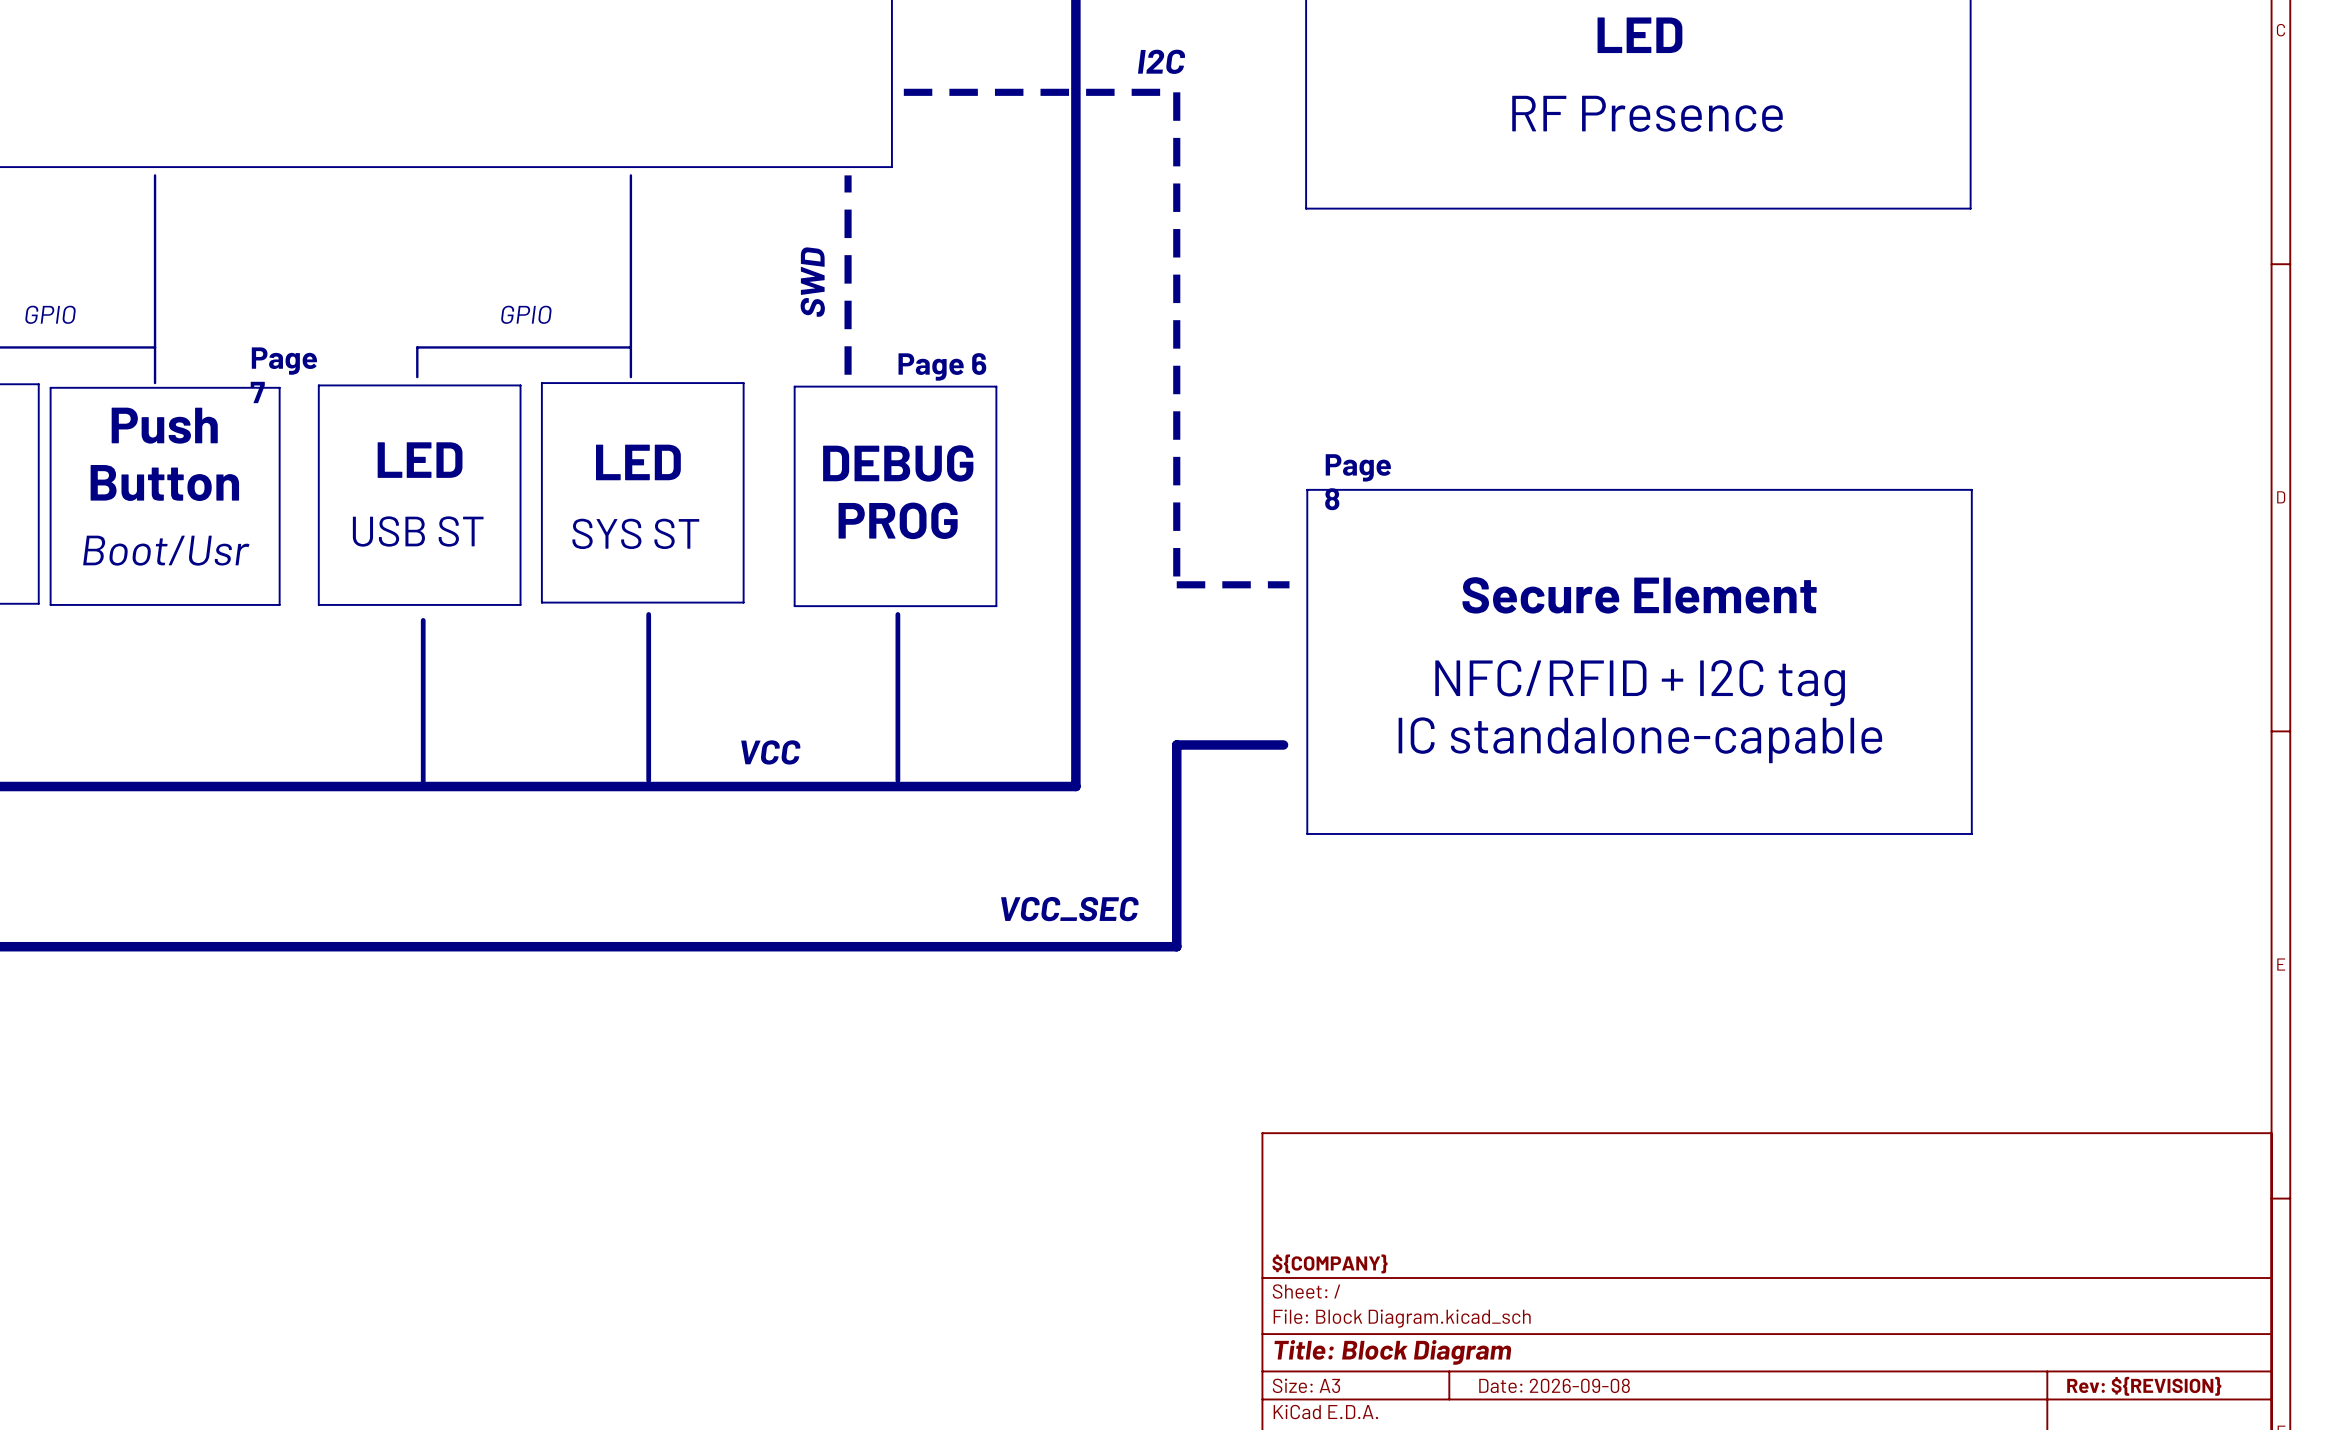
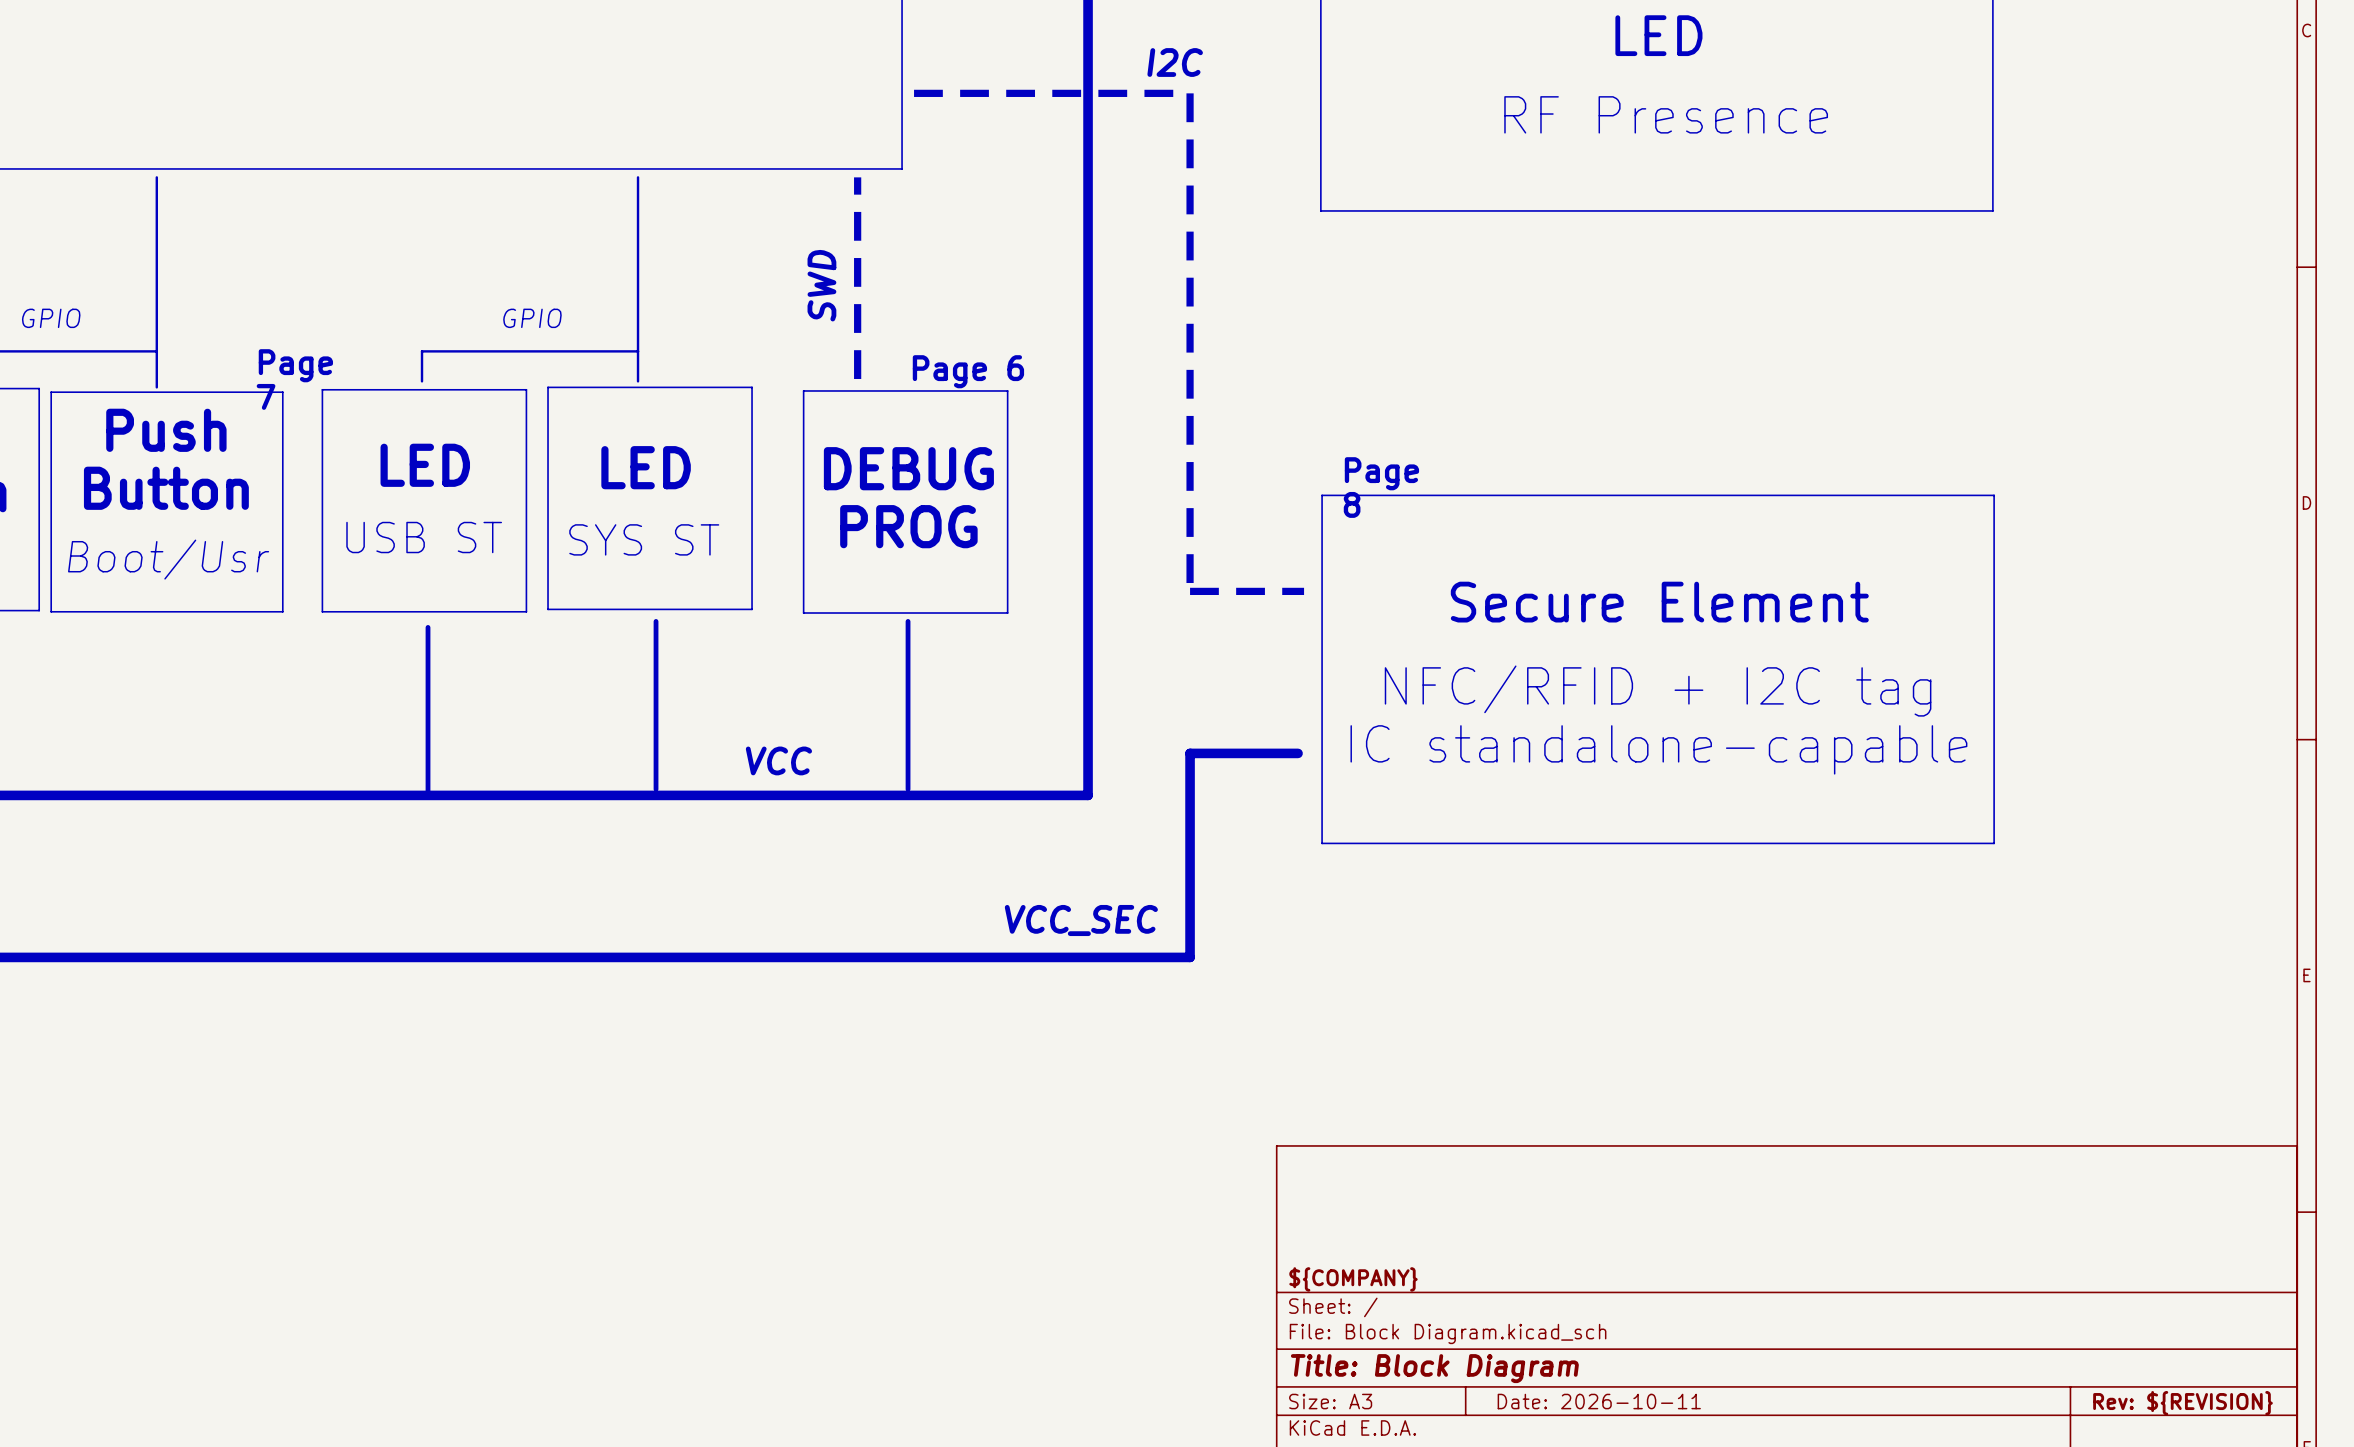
title block: Date: 2026-09-08 (1554, 1385) -> Date: 2026-10-11 (1599, 1401)

